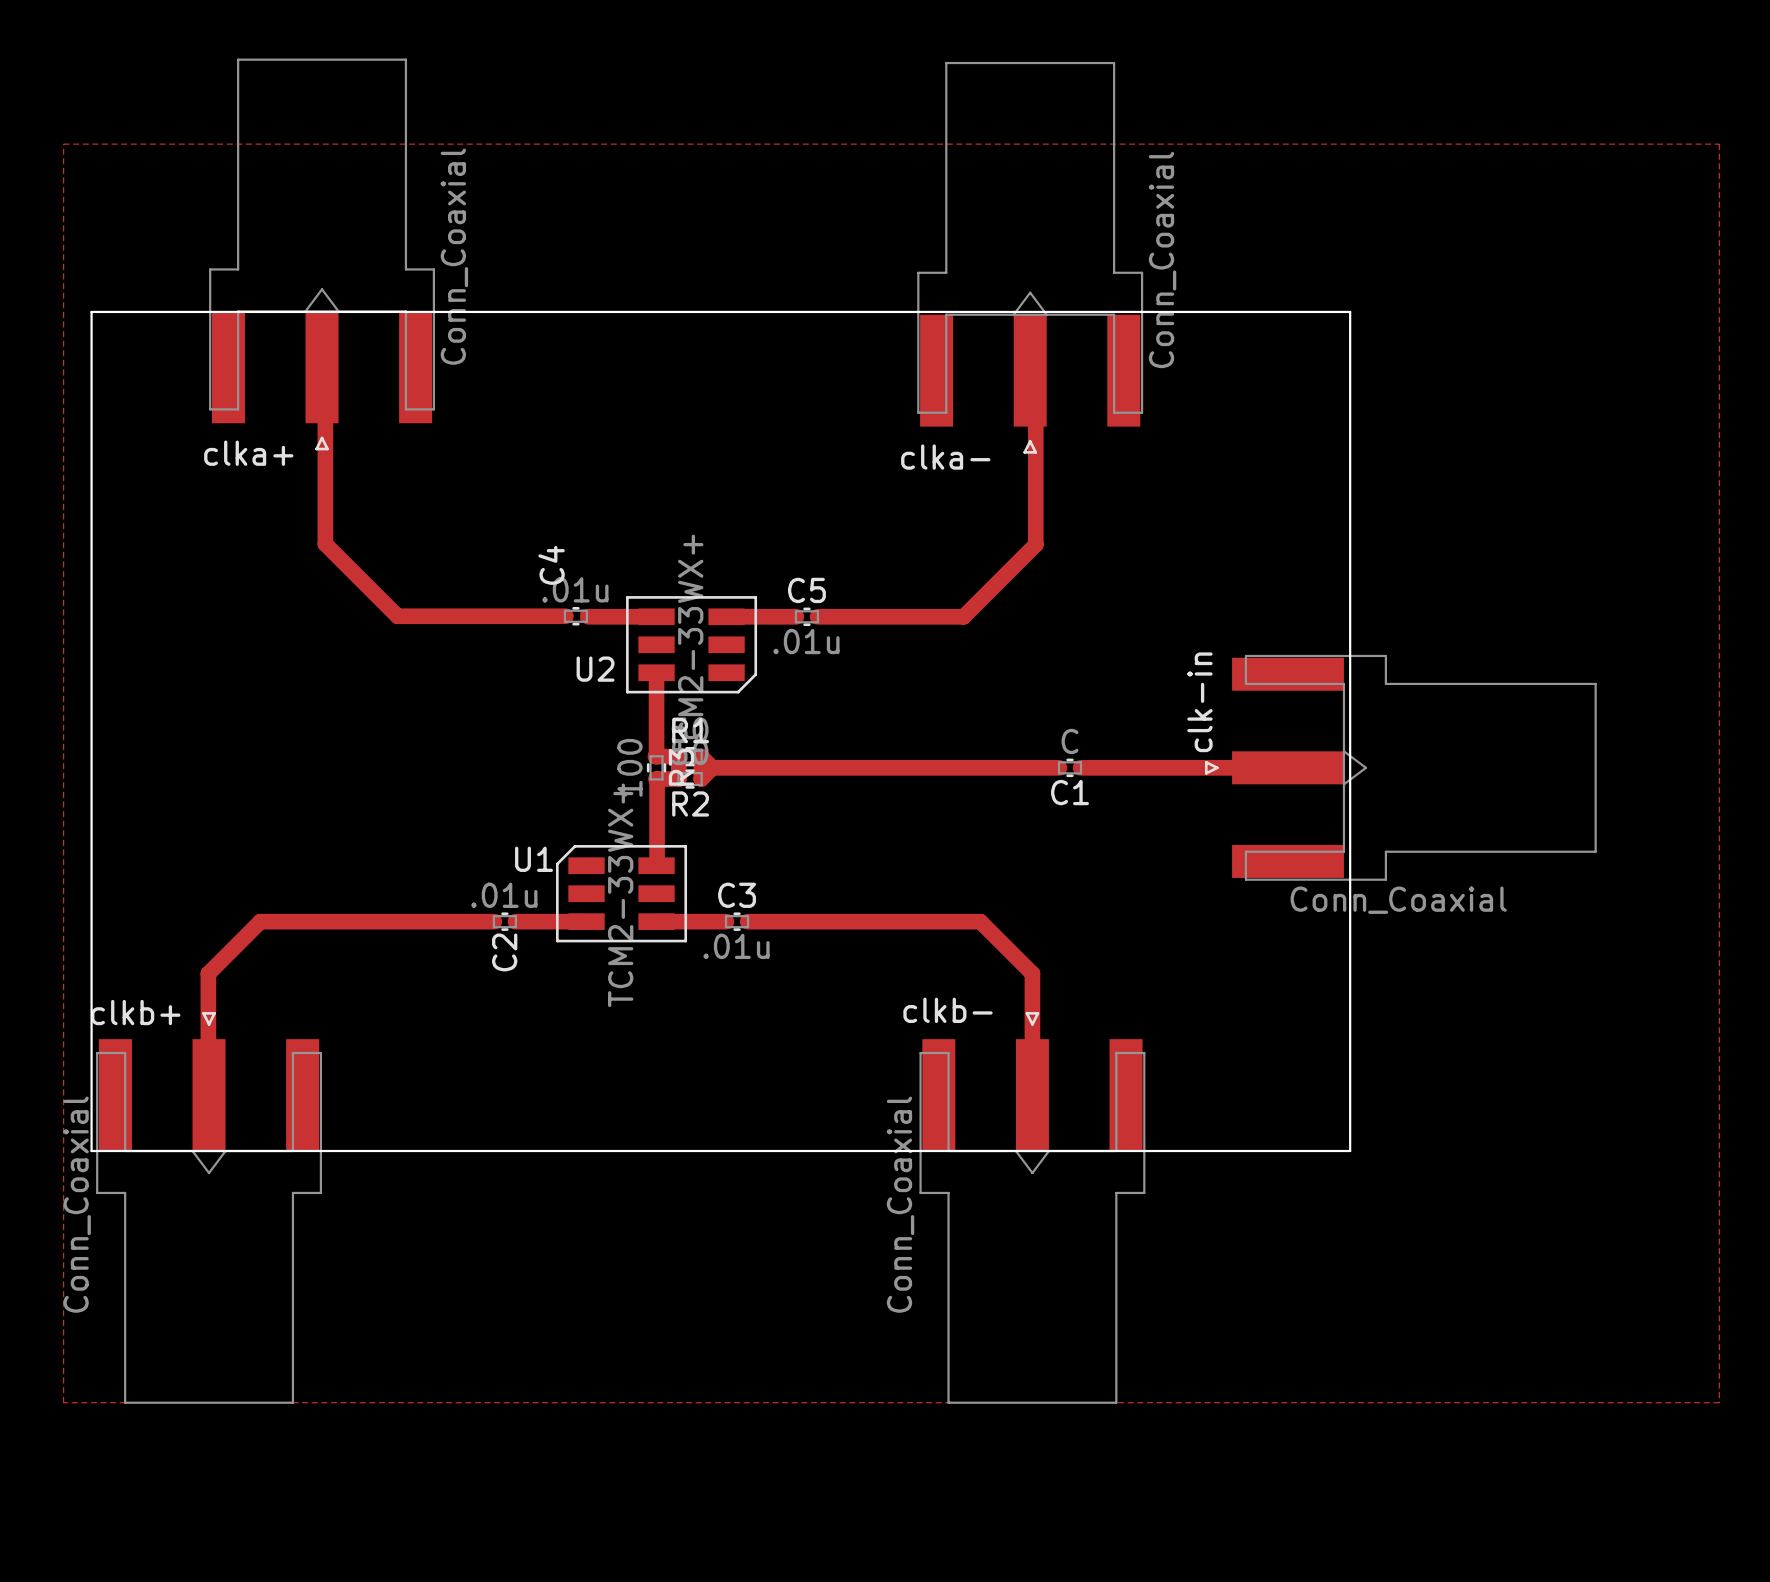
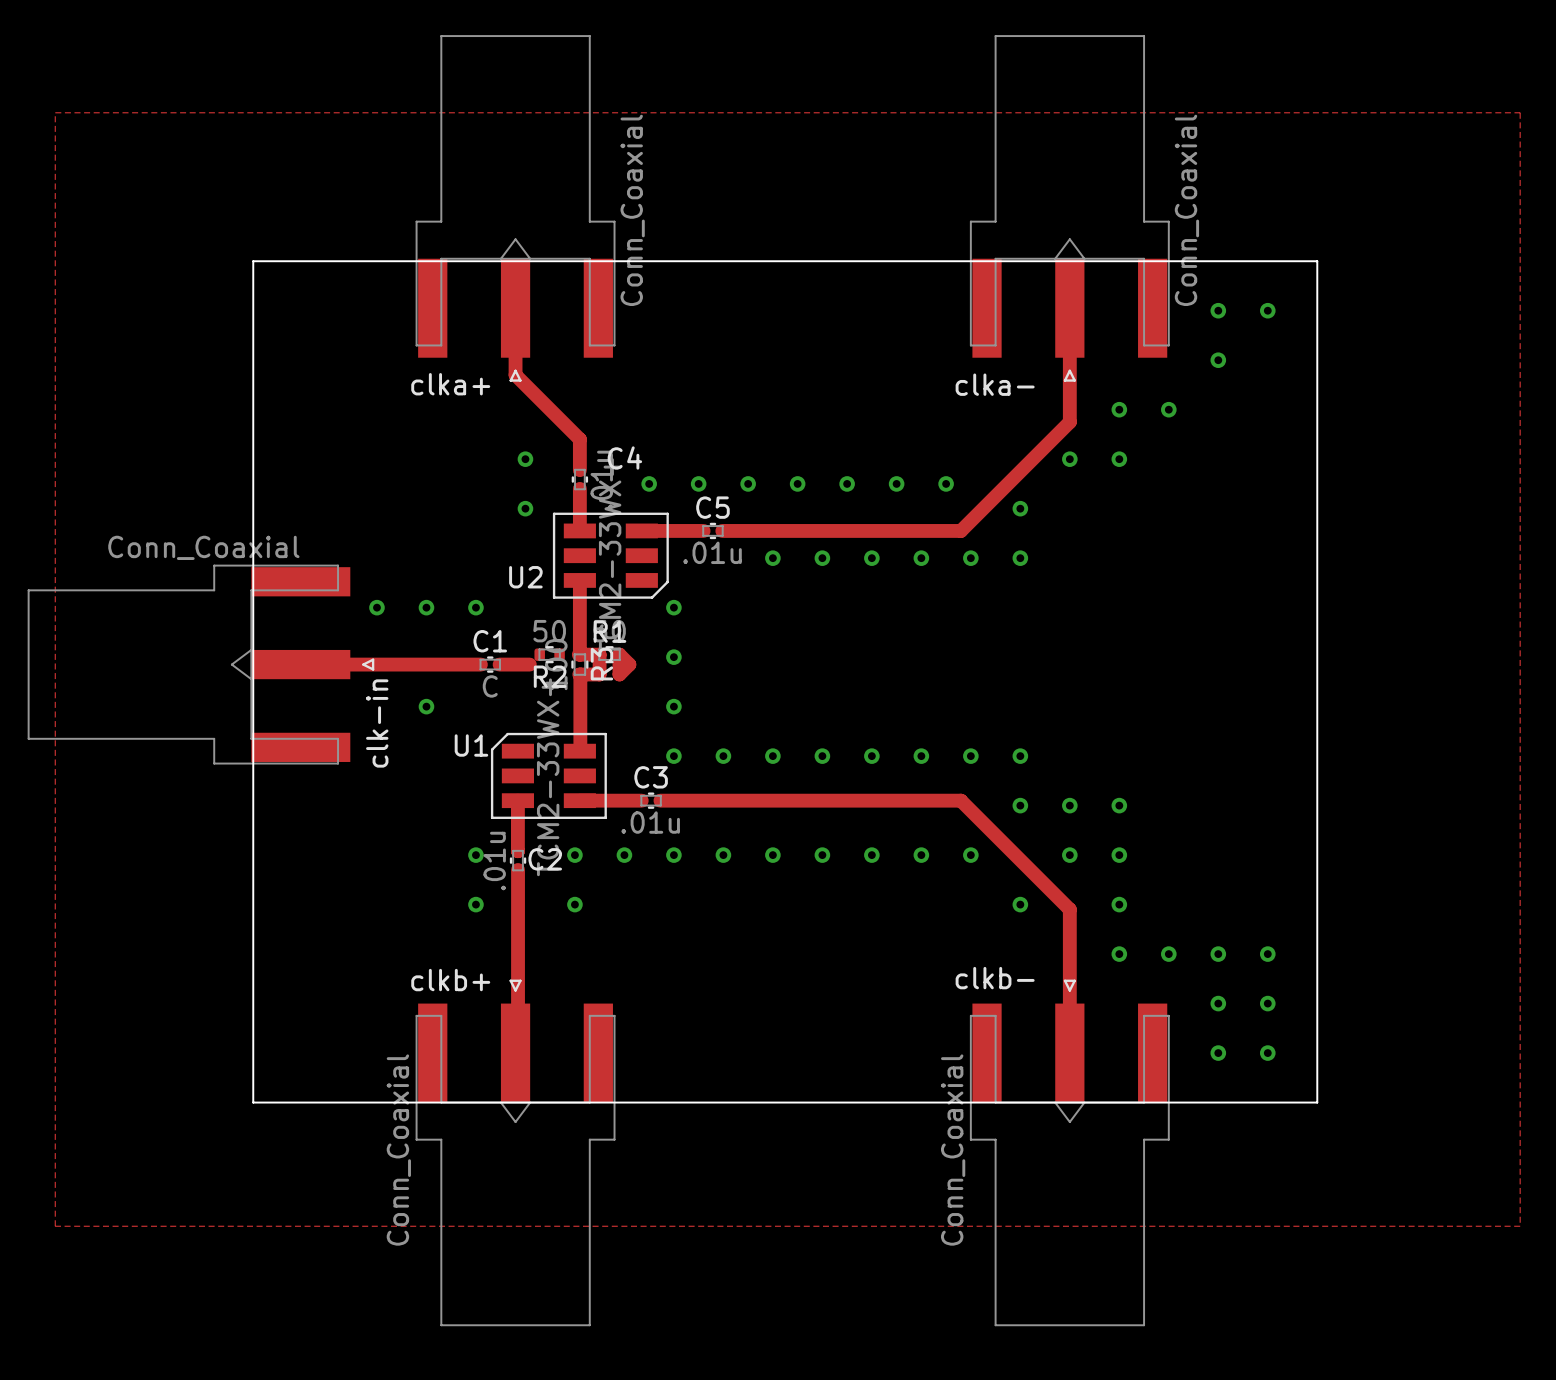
clka+ position: (322, 254) -> (515, 208)
clka- position: (1030, 257) -> (1069, 208)
board edge: (287, 311) (91, 311) (91, 1151) (1350, 1151) (1350, 311) -> (253, 261) (253, 1102) (1317, 1102) (1317, 261) (1193, 261)
track: none -> (515, 308) (515, 375) (579, 439) (579, 470)
via: none -> (1218, 310)
via: none -> (1267, 310)
track: (1035, 376) (1035, 544) (963, 616) -> (1069, 308) (1069, 422) (960, 530) (851, 530)
track: (325, 397) (325, 544) (397, 616) (565, 616) -> none
via: none -> (1218, 360)
via: none -> (1119, 409)
via: none -> (1168, 409)
via: none -> (525, 459)
via: none -> (1069, 459)
via: none -> (1119, 459)
via: none -> (649, 483)
via: none -> (698, 483)
via: none -> (748, 483)
via: none -> (797, 483)
via: none -> (847, 483)
via: none -> (896, 483)
via: none -> (946, 483)
track: none -> (579, 488) (579, 530)
via: none -> (525, 508)
via: none -> (1020, 508)
C4 rotation: 0° (575, 616) -> 90° clockwise (579, 479)
C4 position: (575, 616) -> (579, 479)
track: (588, 616) (657, 616) -> none
via: none -> (772, 558)
via: none -> (822, 558)
via: none -> (871, 558)
via: none -> (921, 558)
via: none -> (970, 558)
via: none -> (1020, 558)
via: none -> (376, 607)
via: none -> (426, 607)
via: none -> (475, 607)
via: none -> (673, 607)
C1 value position: C (1070, 741) -> C (490, 686)
via: none -> (673, 657)
clk-in: none -> Conn_Coaxial (200, 664)
track: none -> (300, 664) (480, 664)
track: none -> (499, 664) (529, 664)
track: (712, 767) (1059, 767) -> none
C1 position: (1070, 767) -> (490, 664)
track: (1080, 767) (1284, 767) -> none
clk-in: Conn_Coaxial (1400, 767) -> none
R2 position: (690, 779) -> (549, 654)
C1 name position: C1 (1070, 792) -> C1 (490, 641)
via: none -> (426, 706)
via: none -> (673, 706)
via: none -> (673, 756)
via: none -> (723, 756)
via: none -> (772, 756)
via: none -> (822, 756)
via: none -> (871, 756)
via: none -> (921, 756)
via: none -> (970, 756)
via: none -> (1020, 756)
track: (494, 921) (260, 921) (208, 973) (208, 1095) -> none
C2 rotation: 0° (504, 921) -> 90° clockwise (518, 860)
C2 position: (504, 921) -> (518, 860)
track: (515, 921) (586, 921) -> (517, 851) (517, 800)
track: (980, 921) (1032, 973) (1032, 1095) -> (866, 800) (960, 800) (1069, 909) (1069, 1048)
via: none -> (1020, 805)
via: none -> (1069, 805)
via: none -> (1119, 805)
via: none -> (475, 855)
via: none -> (574, 855)
via: none -> (624, 855)
via: none -> (673, 855)
via: none -> (723, 855)
via: none -> (772, 855)
via: none -> (822, 855)
via: none -> (871, 855)
via: none -> (921, 855)
via: none -> (970, 855)
via: none -> (1069, 855)
via: none -> (1119, 855)
track: none -> (518, 869) (518, 1048)
via: none -> (475, 904)
via: none -> (574, 904)
via: none -> (1020, 904)
via: none -> (1119, 904)
via: none -> (1119, 954)
via: none -> (1168, 954)
via: none -> (1218, 954)
via: none -> (1267, 954)
via: none -> (1218, 1003)
via: none -> (1267, 1003)
via: none -> (1218, 1053)
via: none -> (1267, 1053)
clkb+ position: (209, 1207) -> (515, 1152)
clkb- position: (1032, 1207) -> (1069, 1152)

